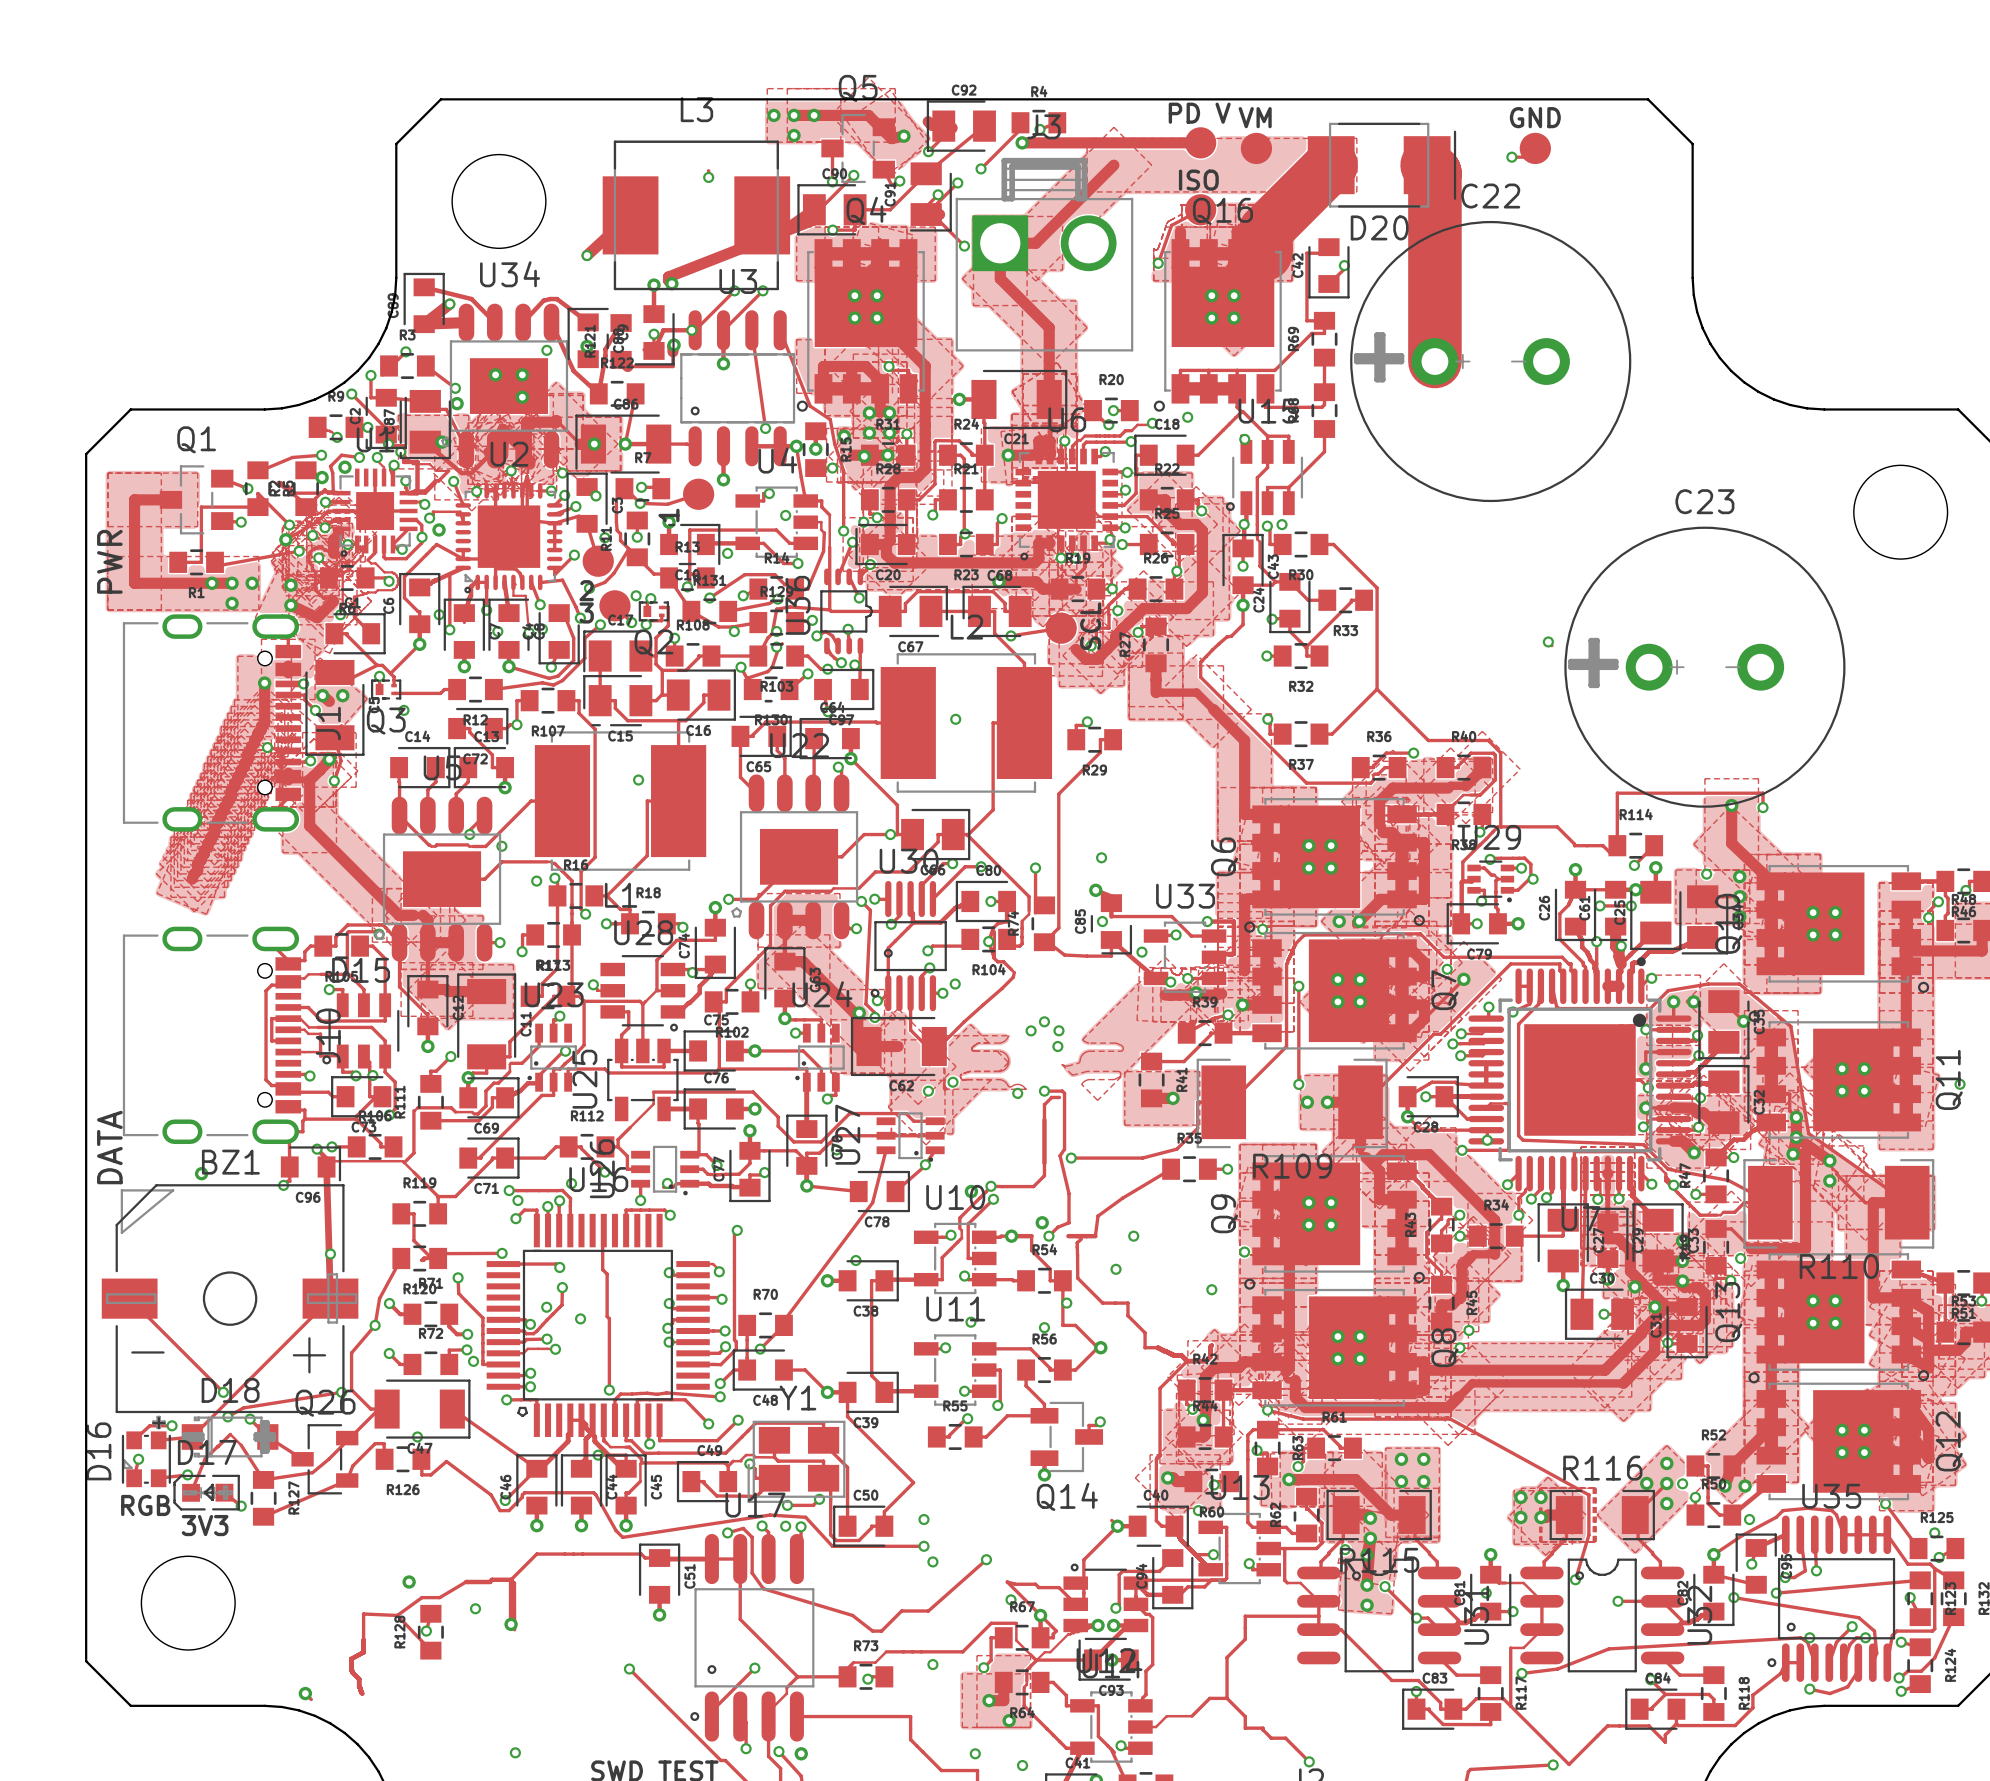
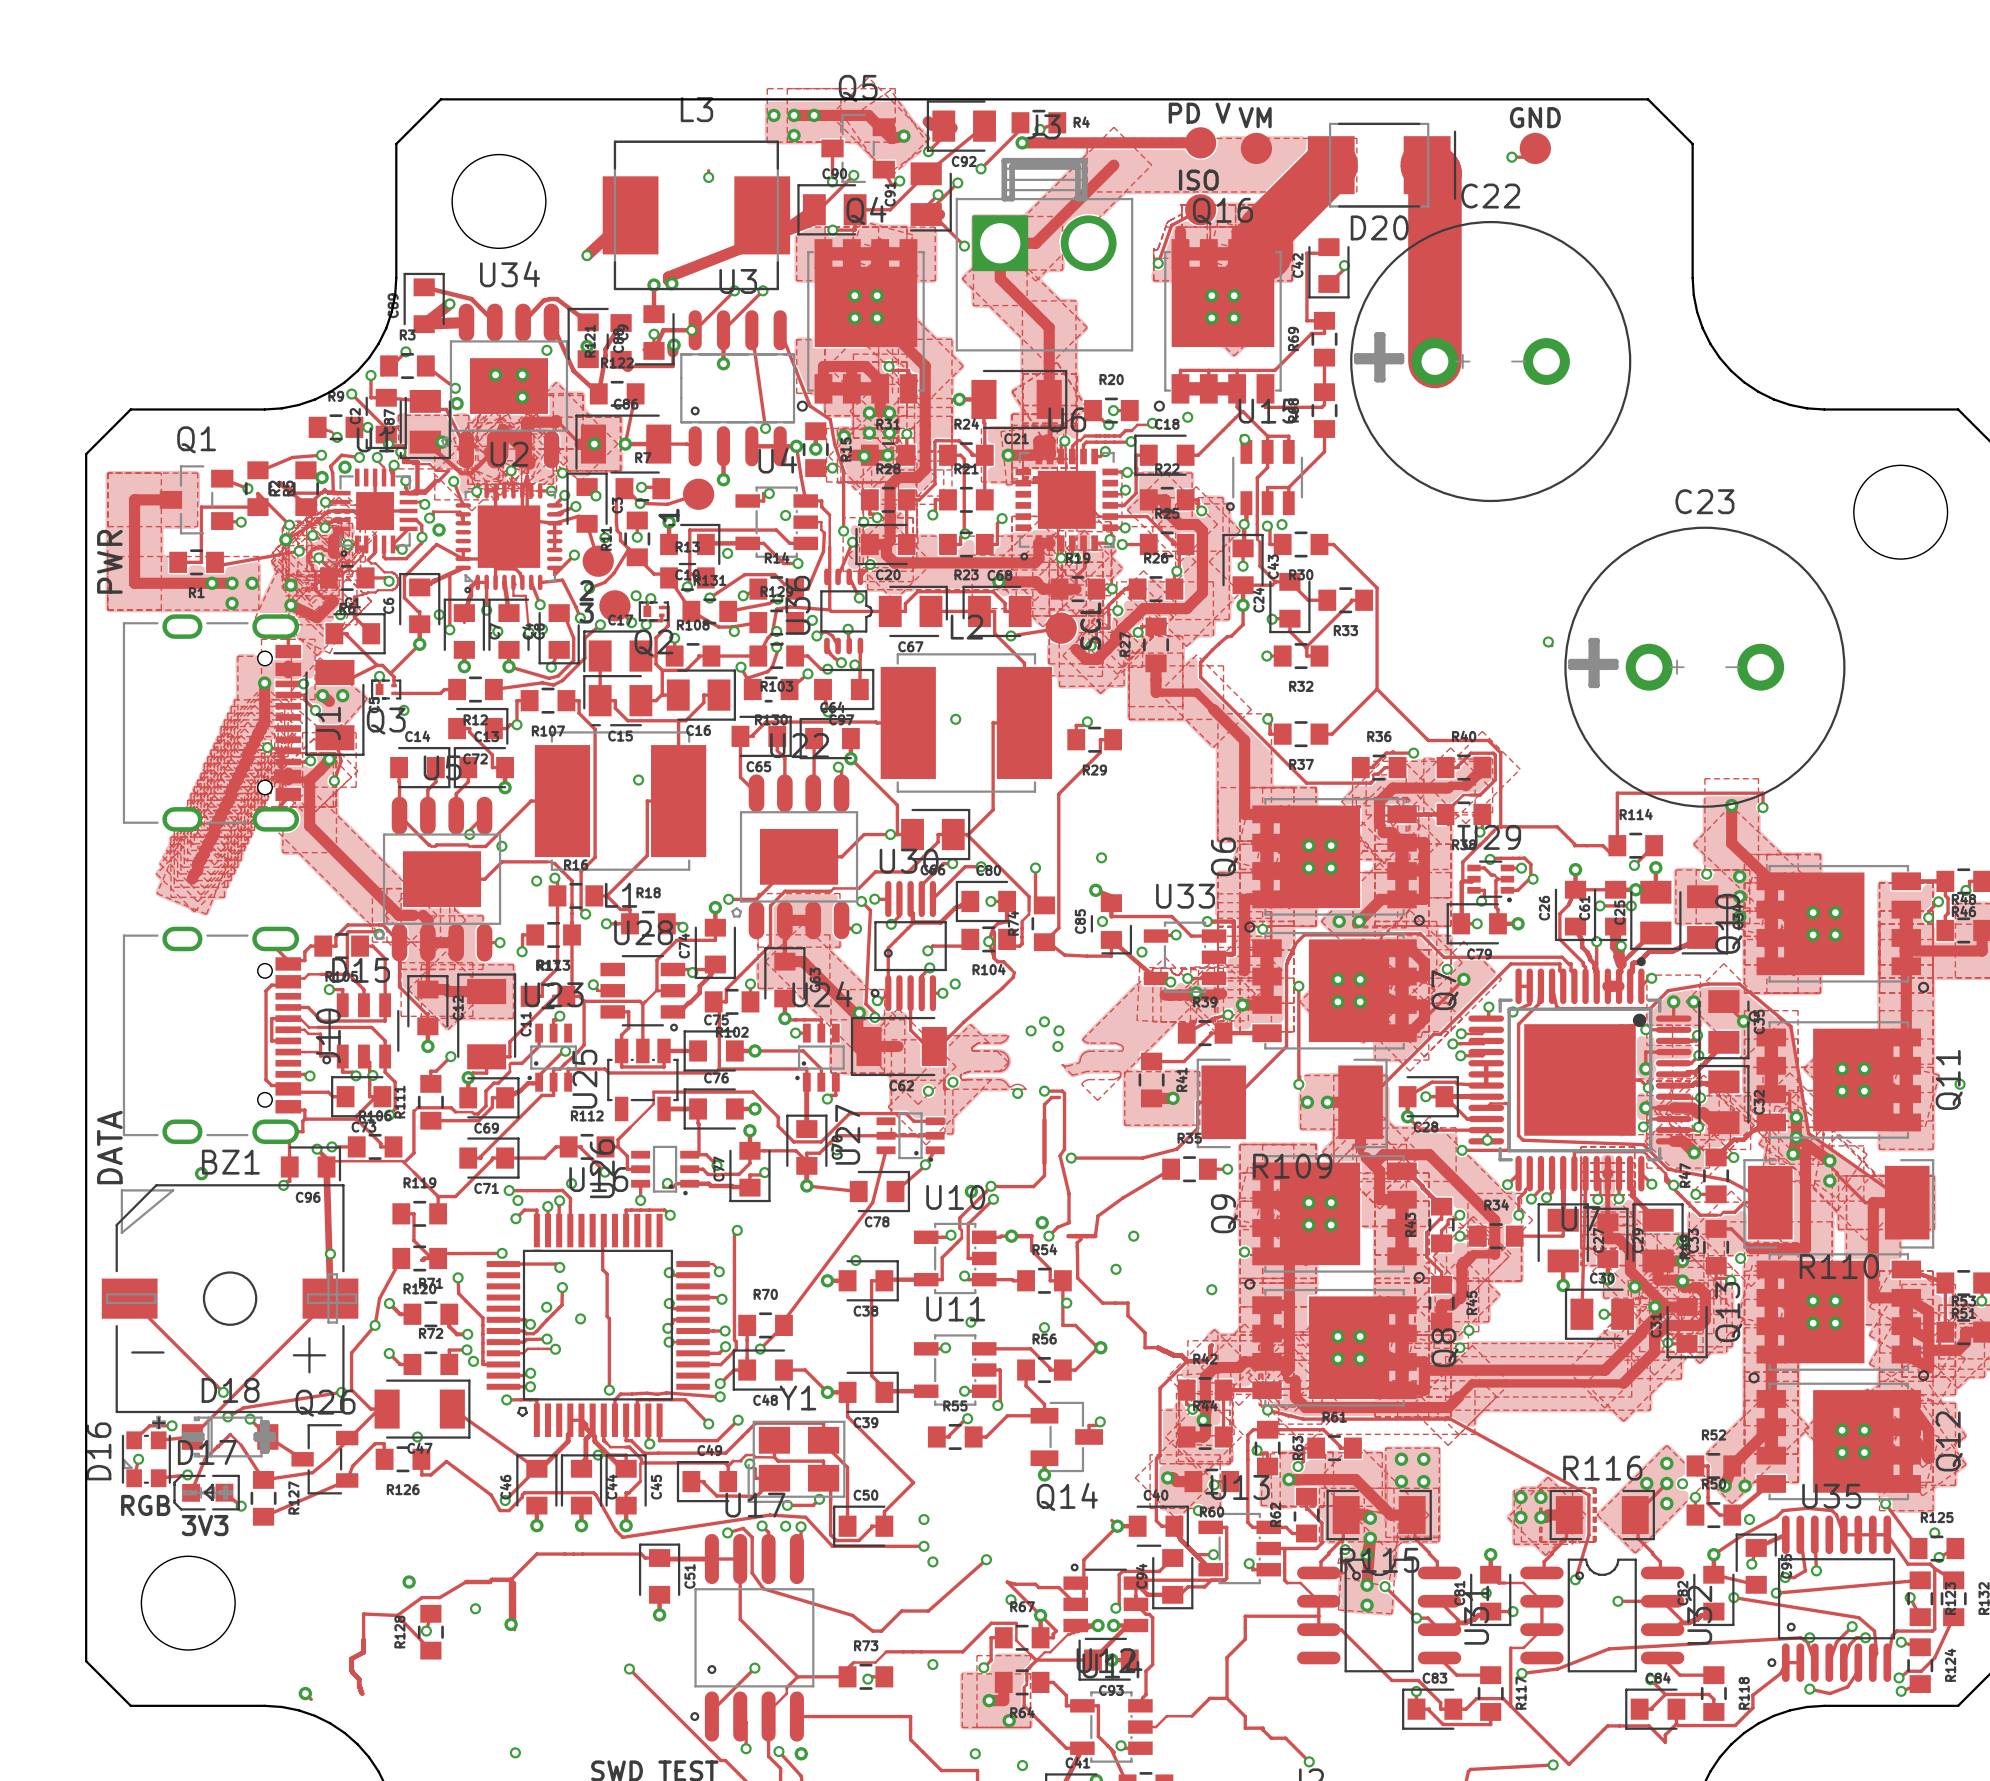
C92 name position: C92 (964, 90) -> C92 (964, 161)
R4 name position: R4 (1039, 91) -> R4 (1081, 122)

